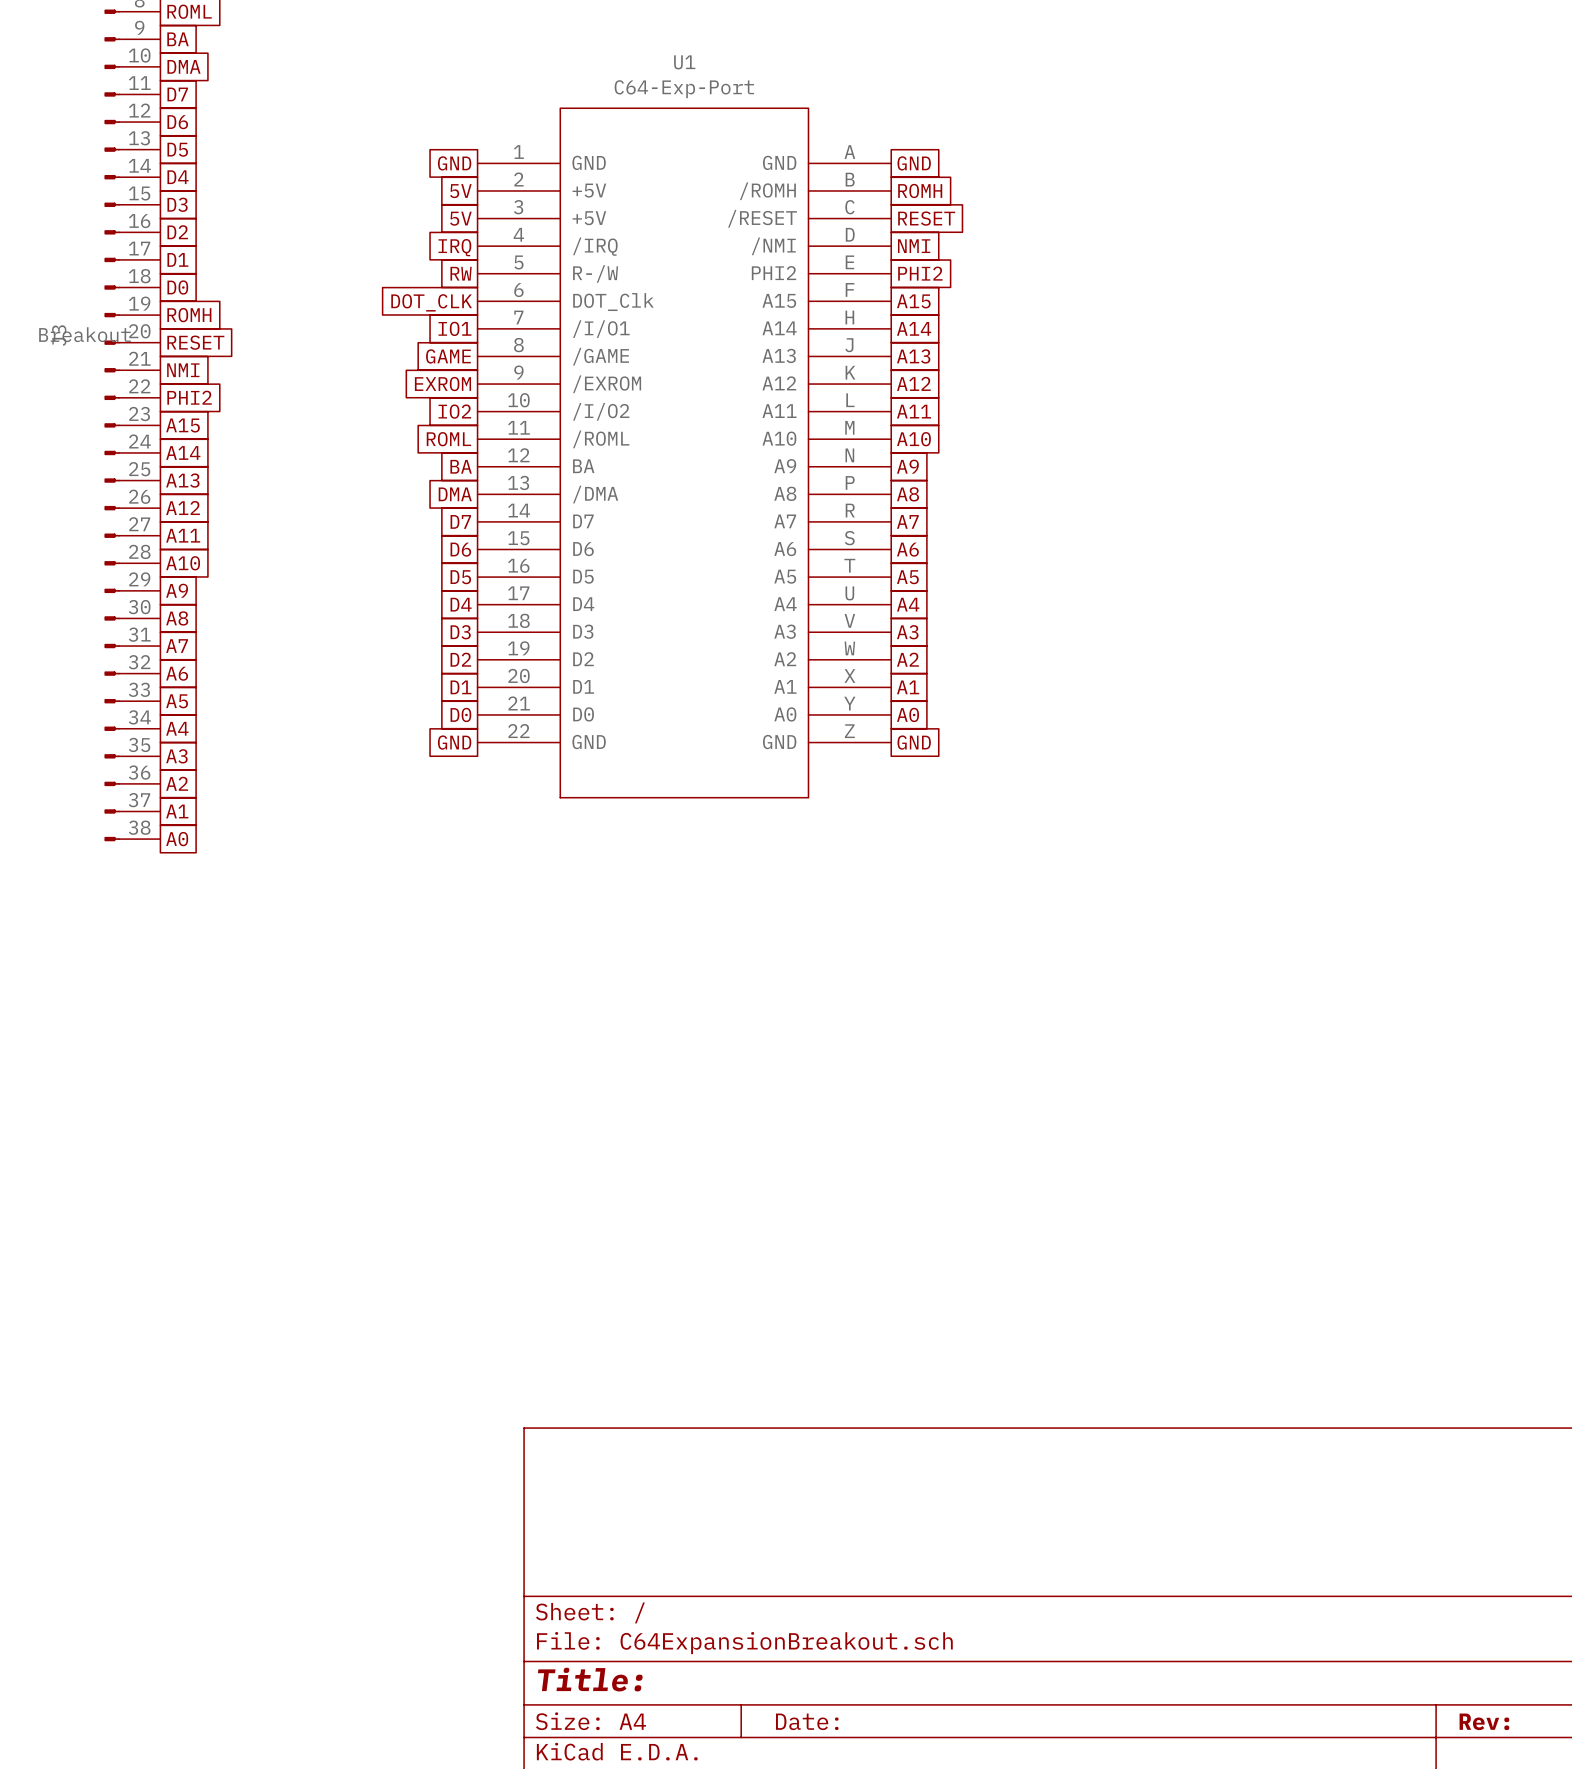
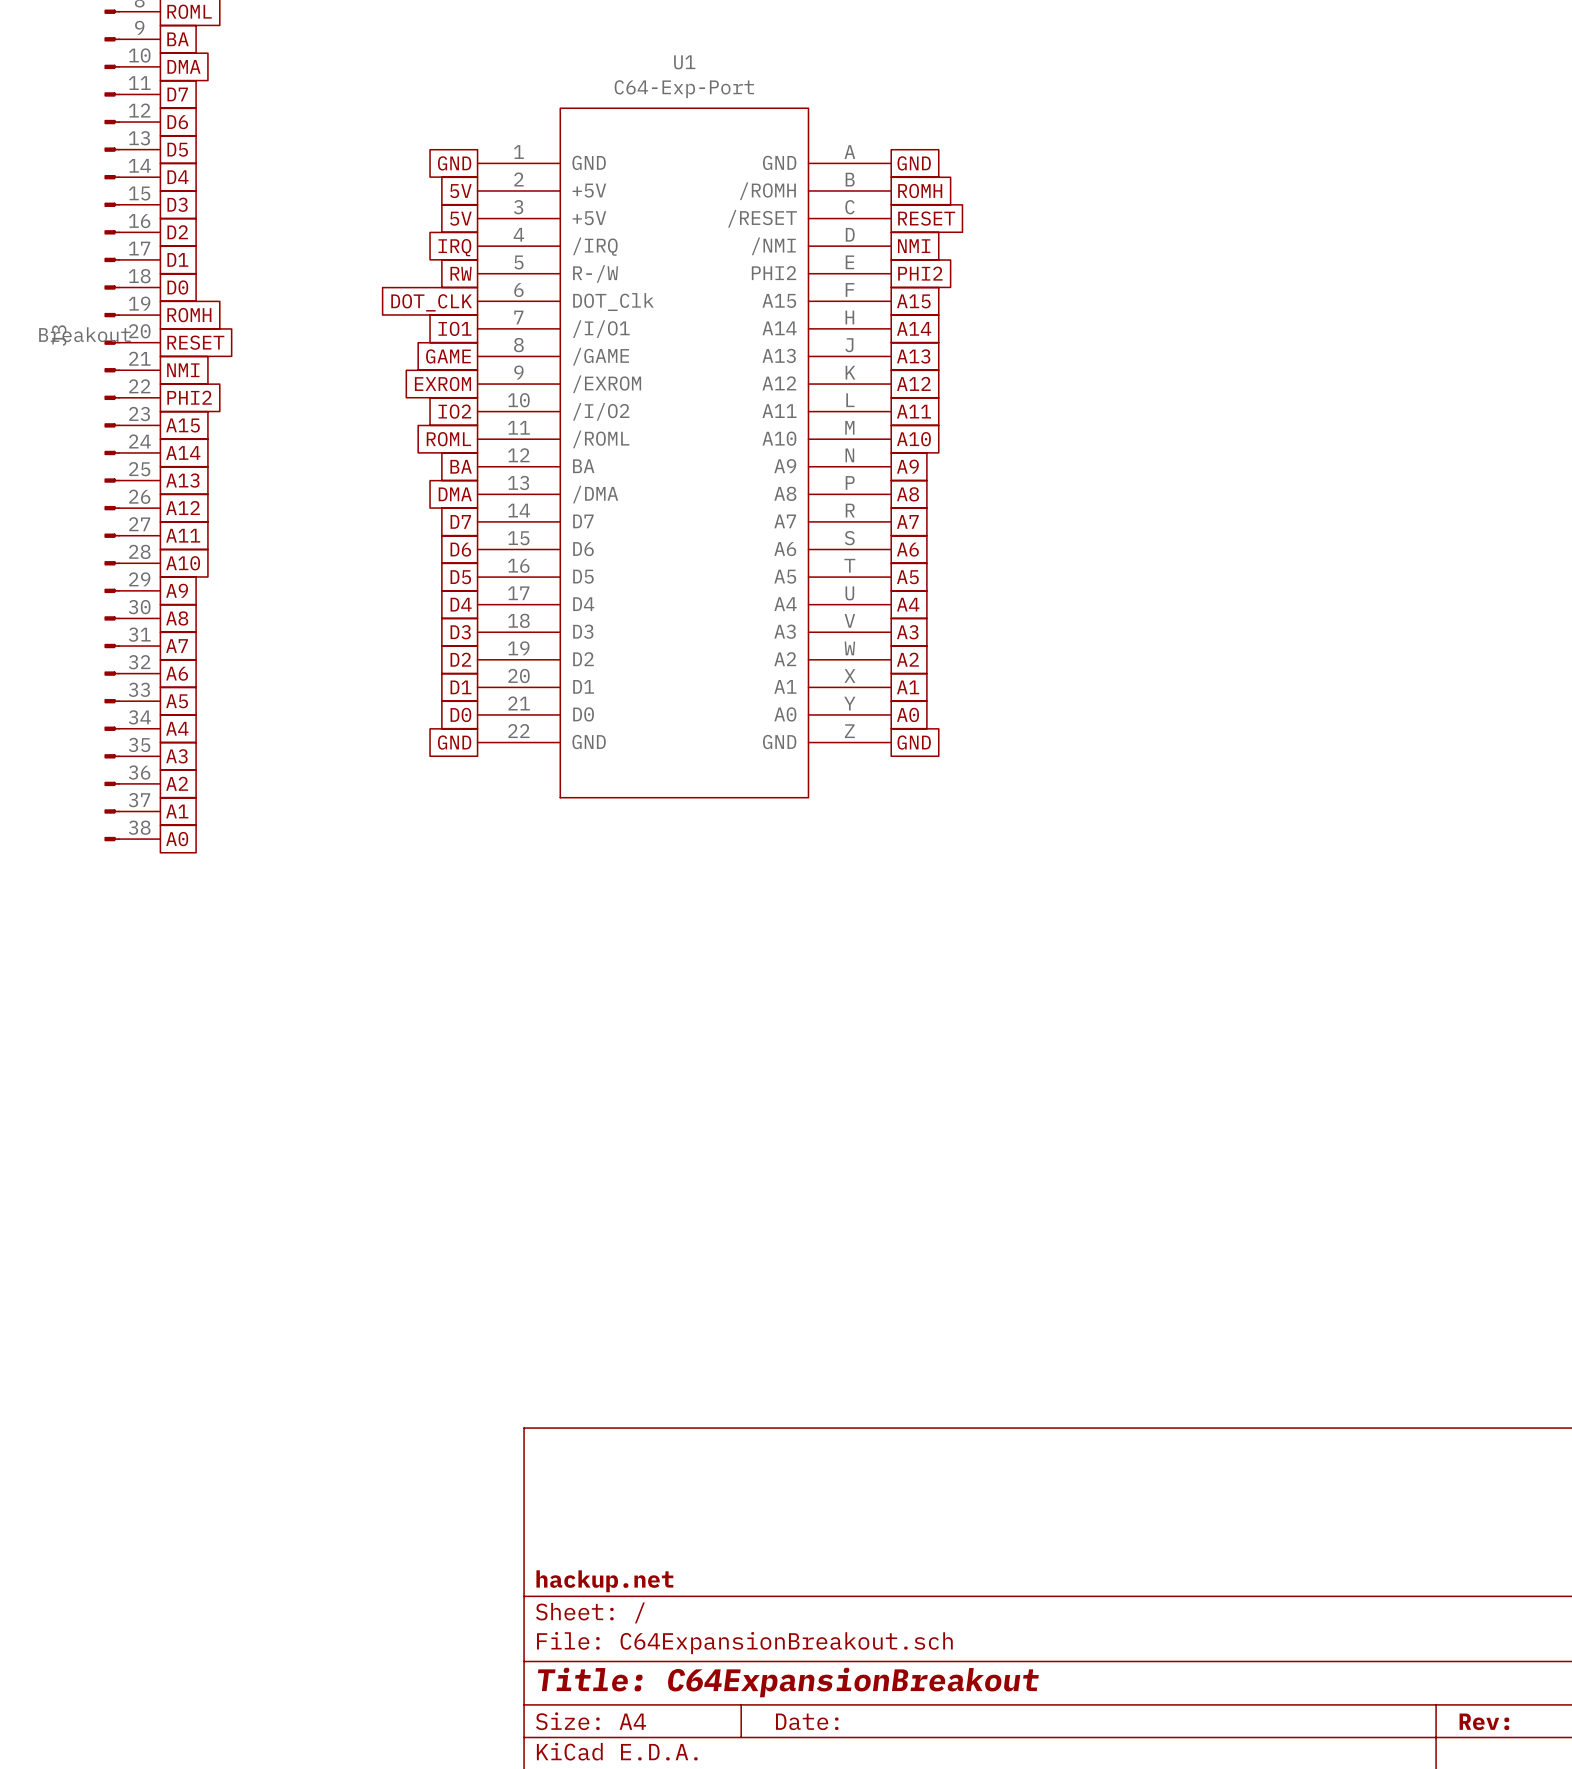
title block: none -> hackup.net (604, 1581)
title block: Title: (590, 1679) -> Title: C64ExpansionBreakout (788, 1682)

